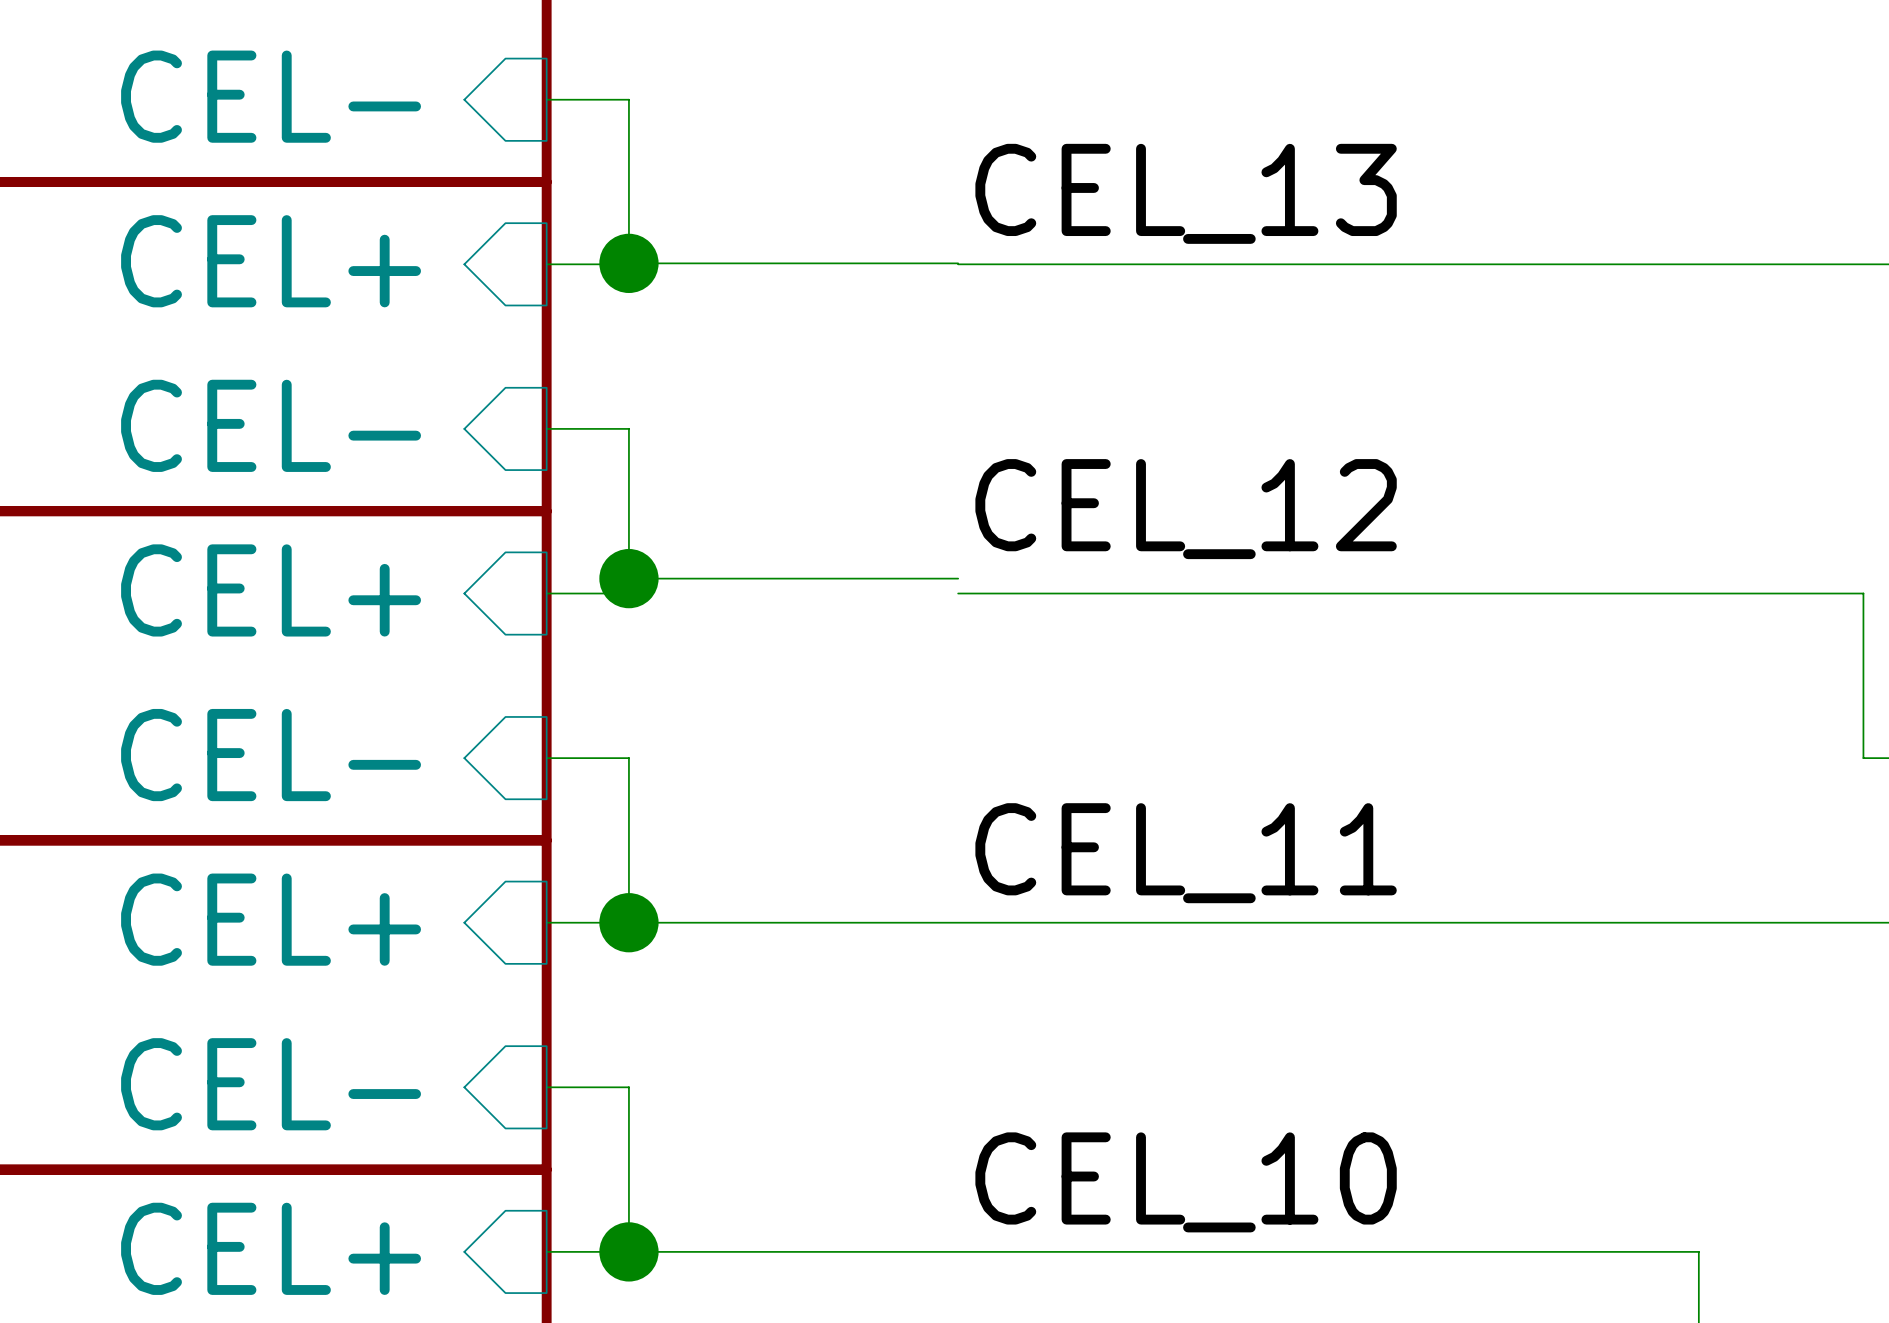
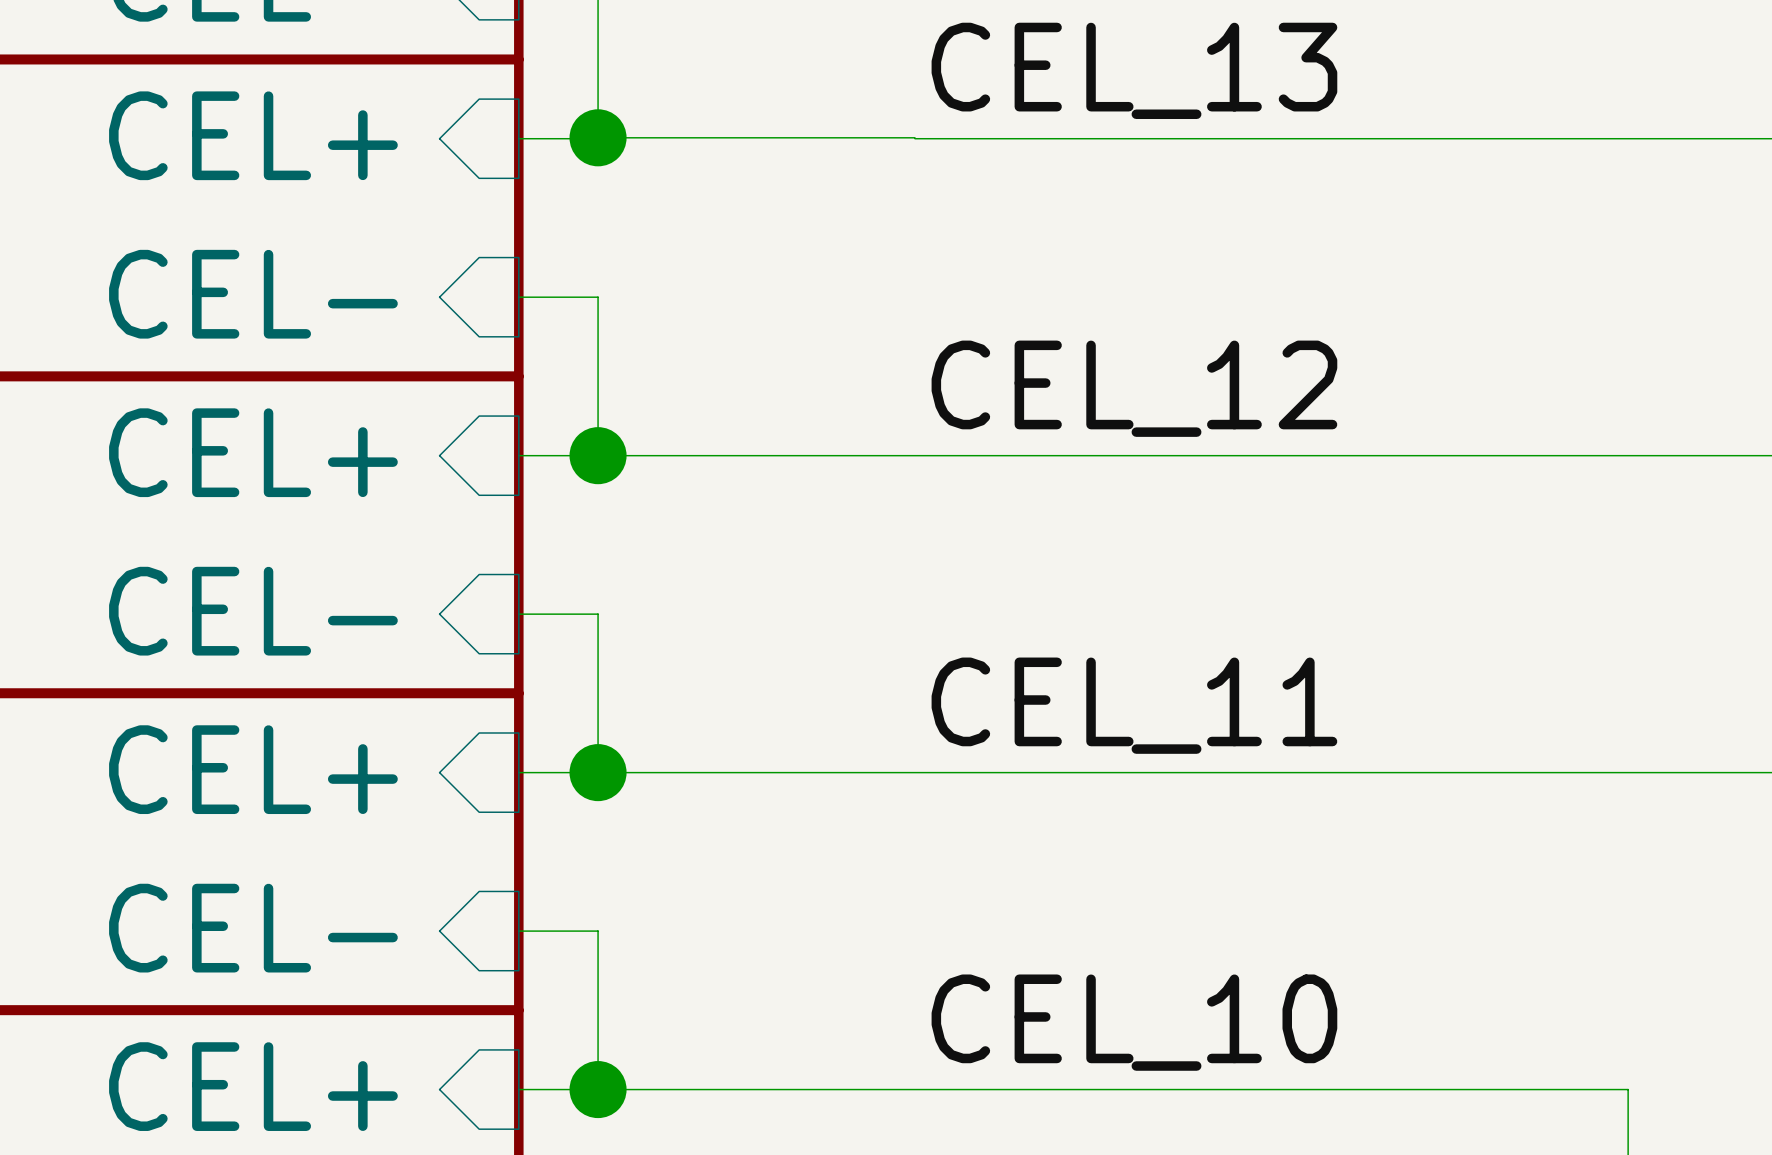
label position: CEL_12 (1186, 509) -> CEL_12 (1134, 388)
wire: (628, 578) (958, 578) -> (598, 455) (914, 455)
junction position: (628, 578) -> (598, 455)

